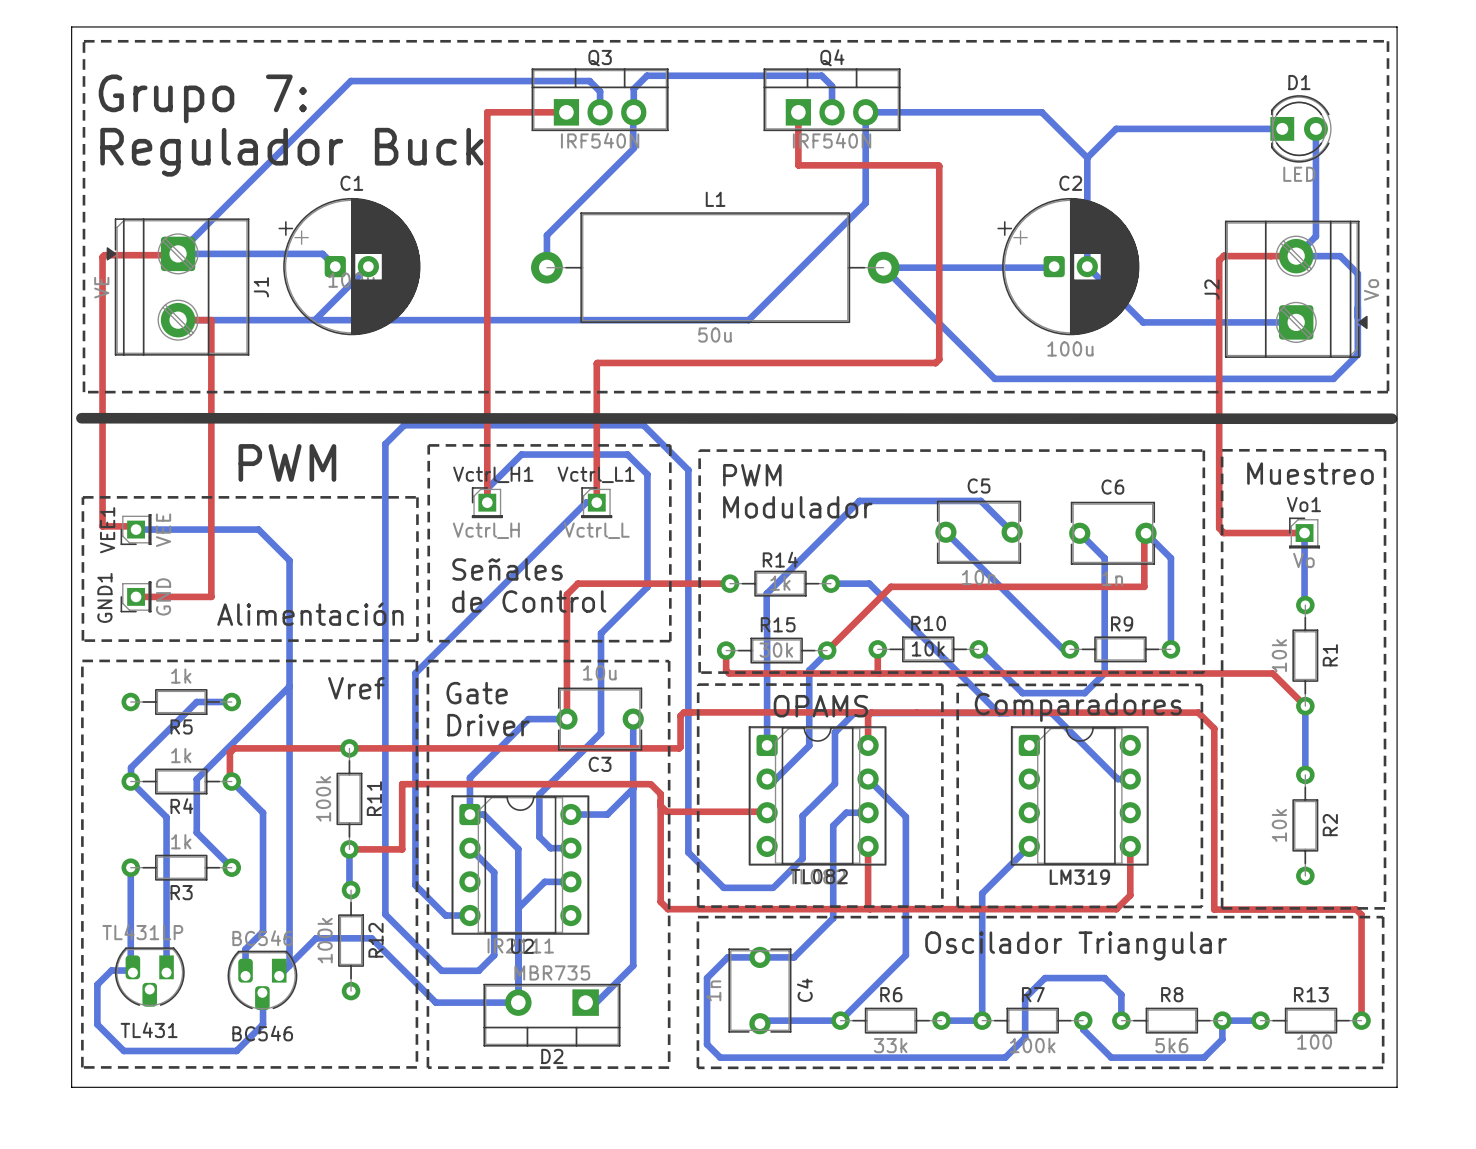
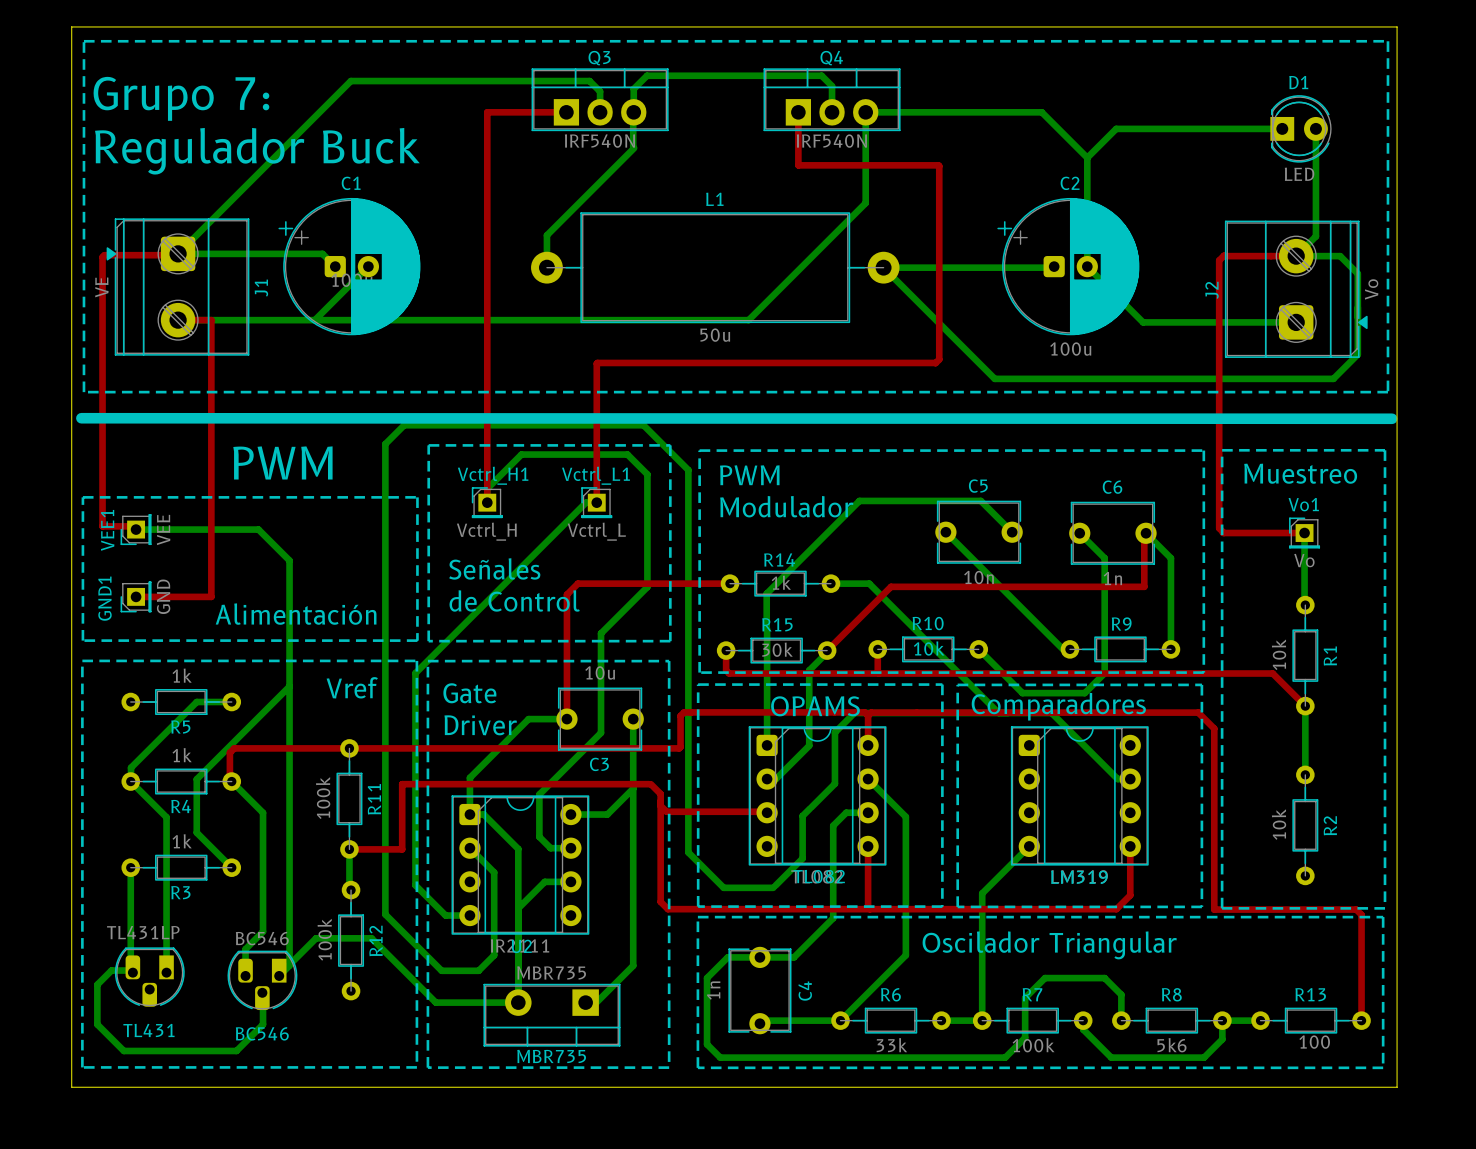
D2 name: D2 (552, 1056) -> MBR735 (551, 1056)

